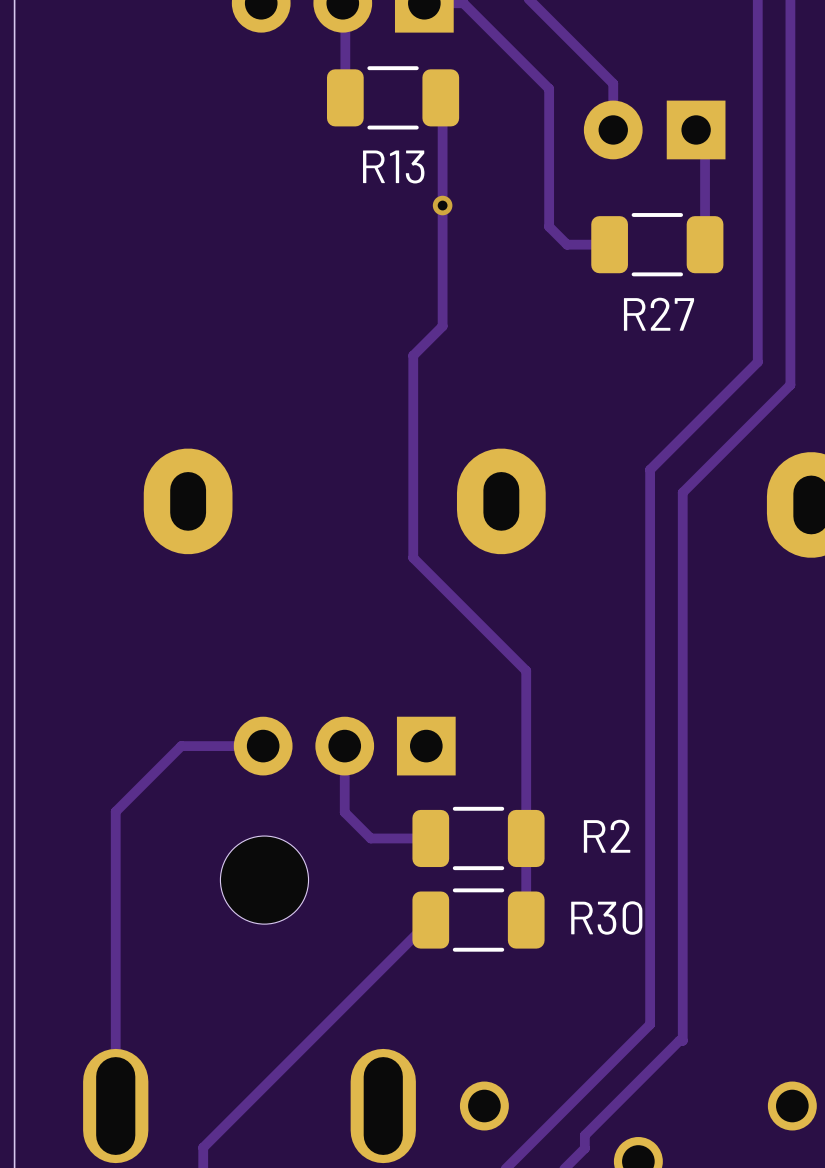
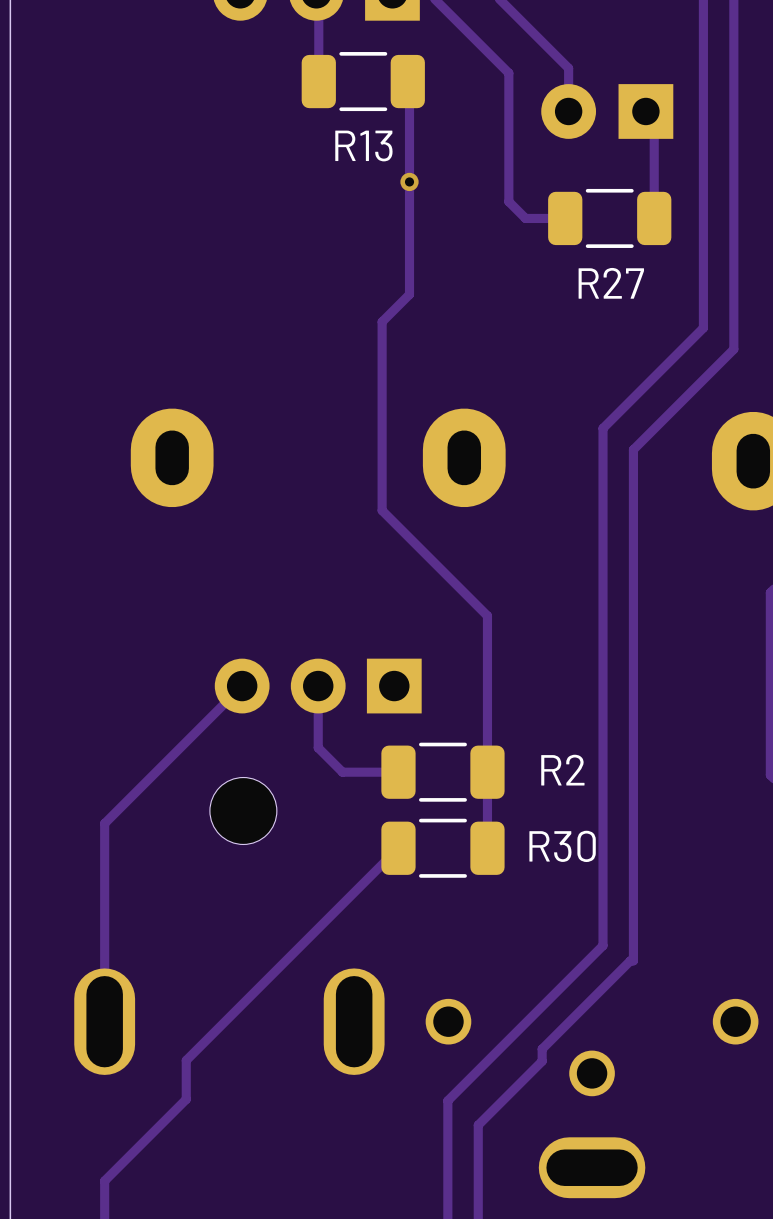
track: (263, 746) (181, 746) (115, 811) (115, 893) -> (242, 686) (104, 823)
part footprint: [220, 836, 309, 925] -> [209, 777, 277, 845]

